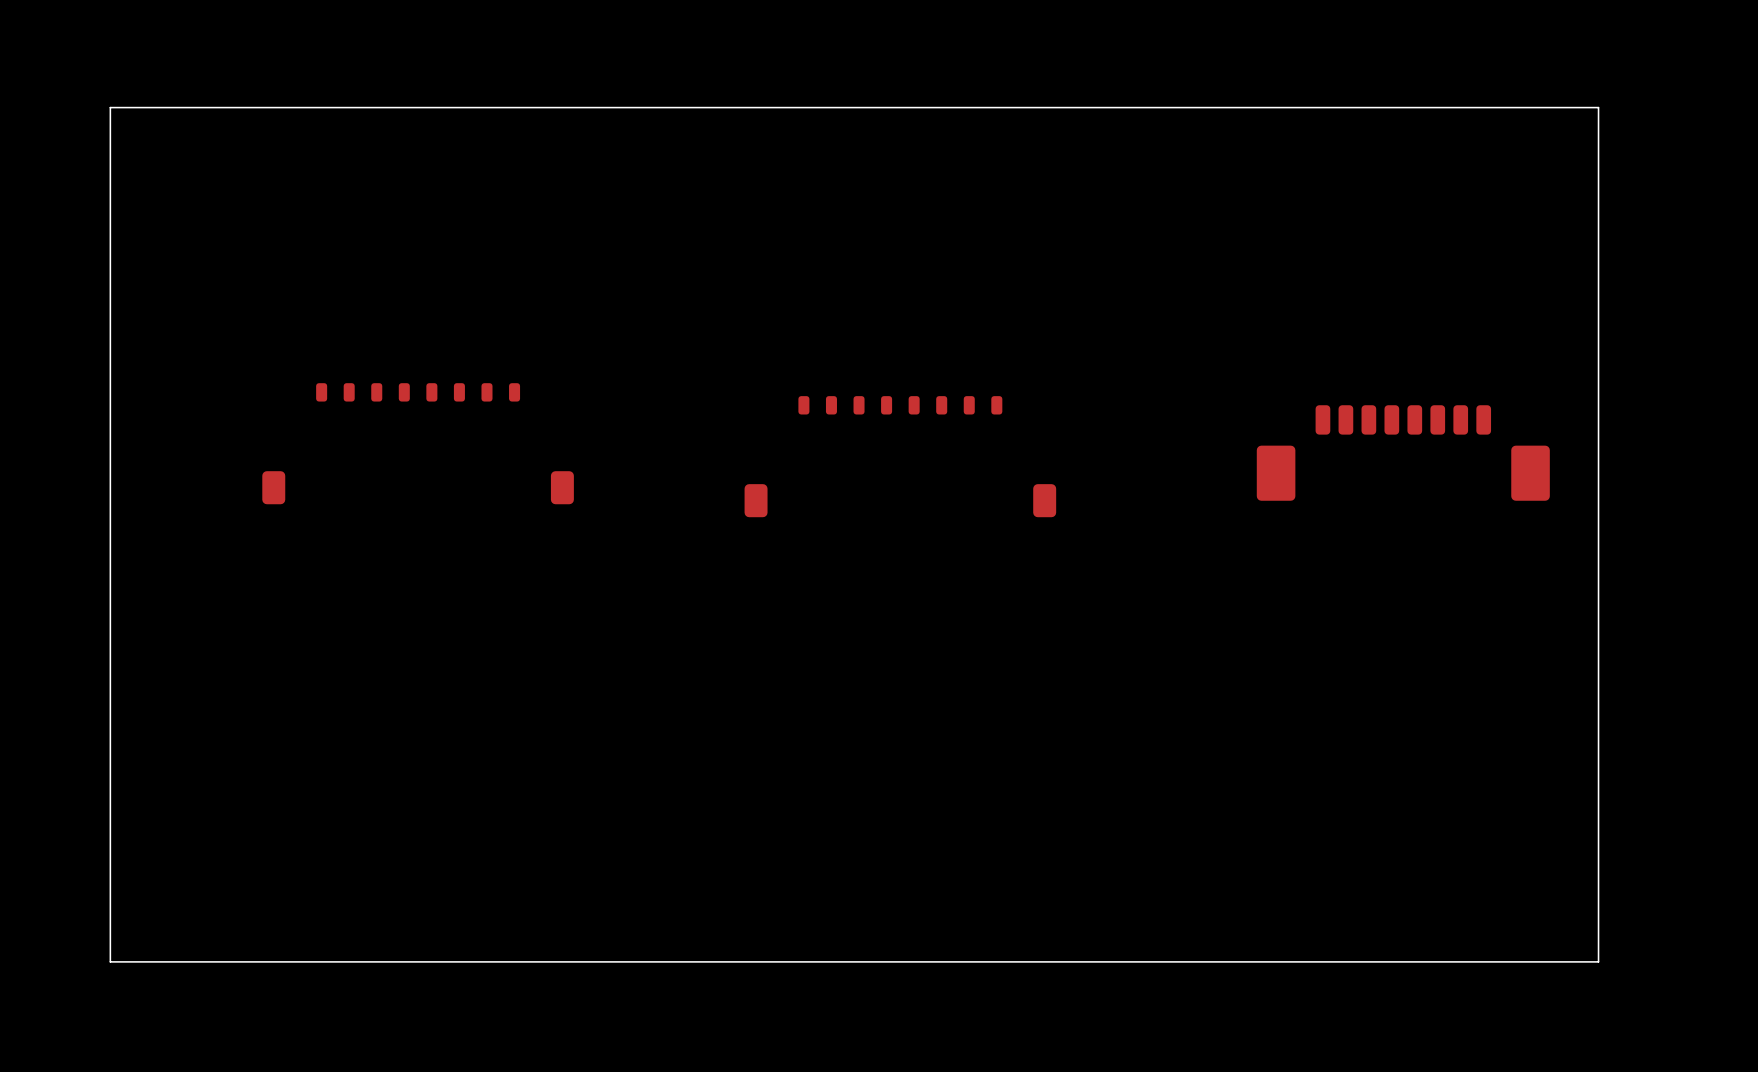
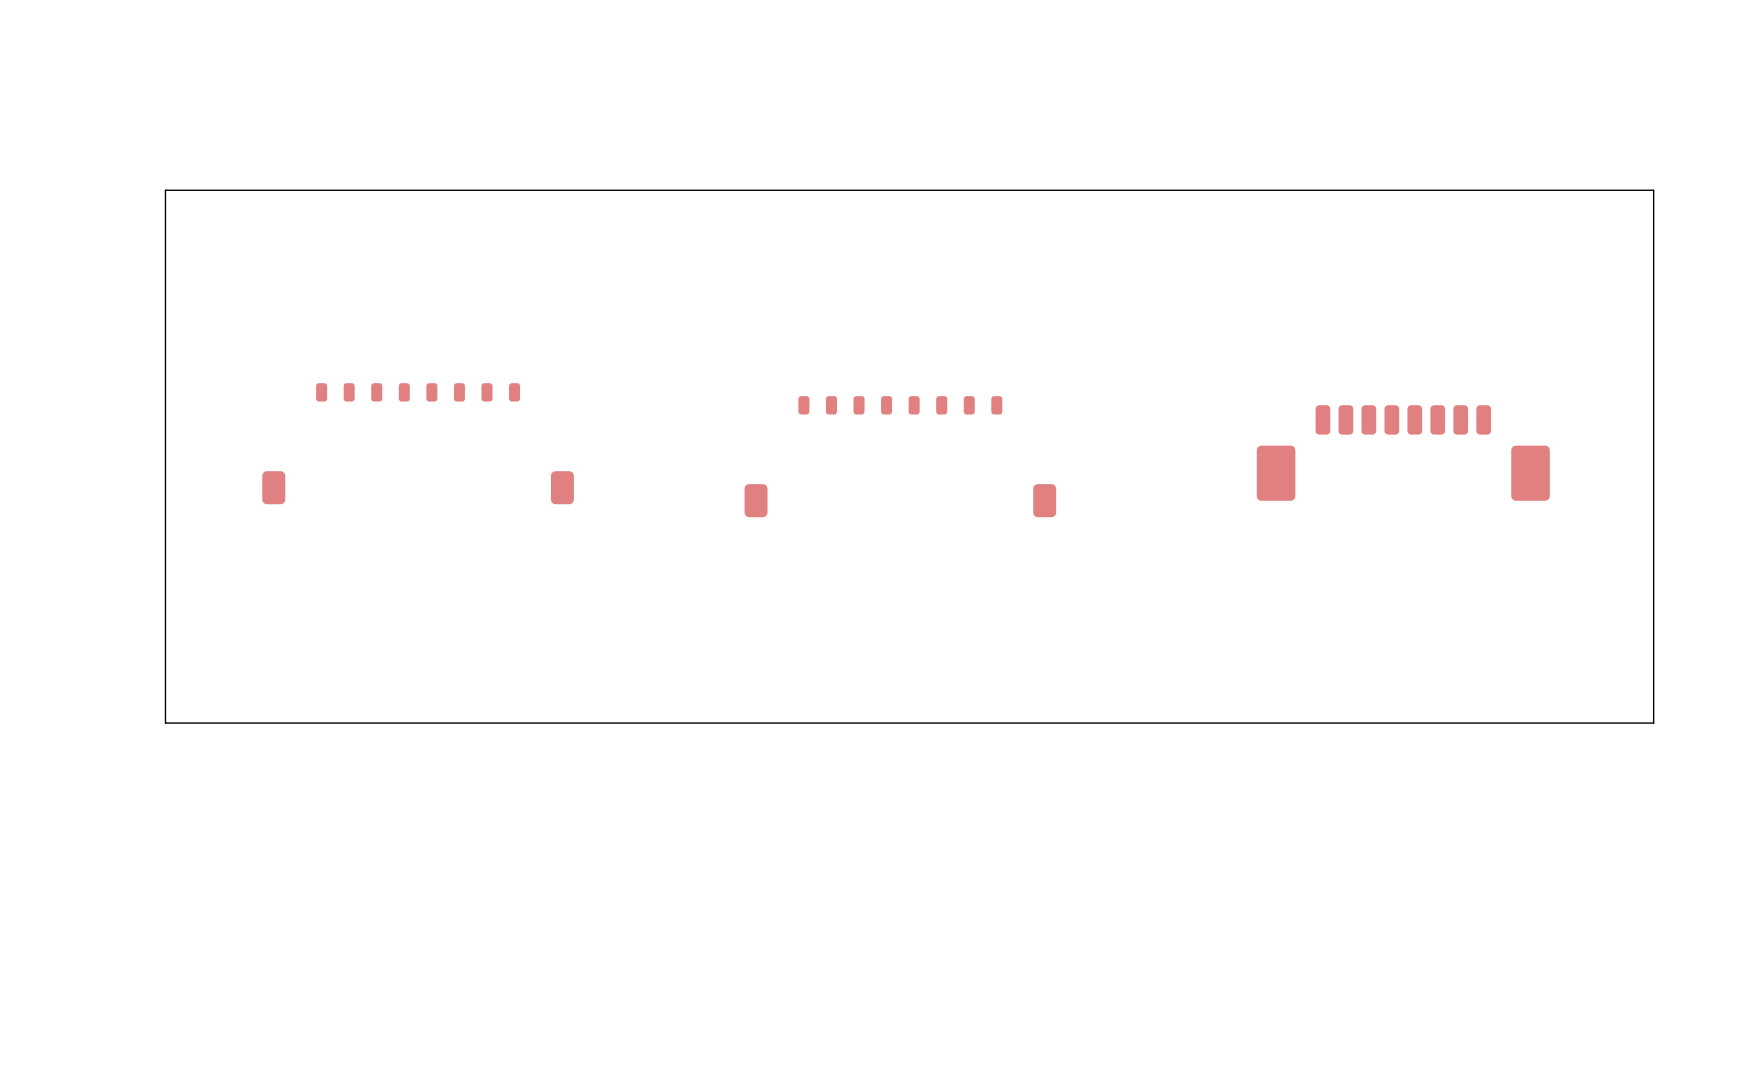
board edge: (1598, 107) (110, 107) (110, 961) (1598, 961) (1598, 107) -> (1653, 190) (1653, 723) (165, 723) (165, 190) (1653, 190)

